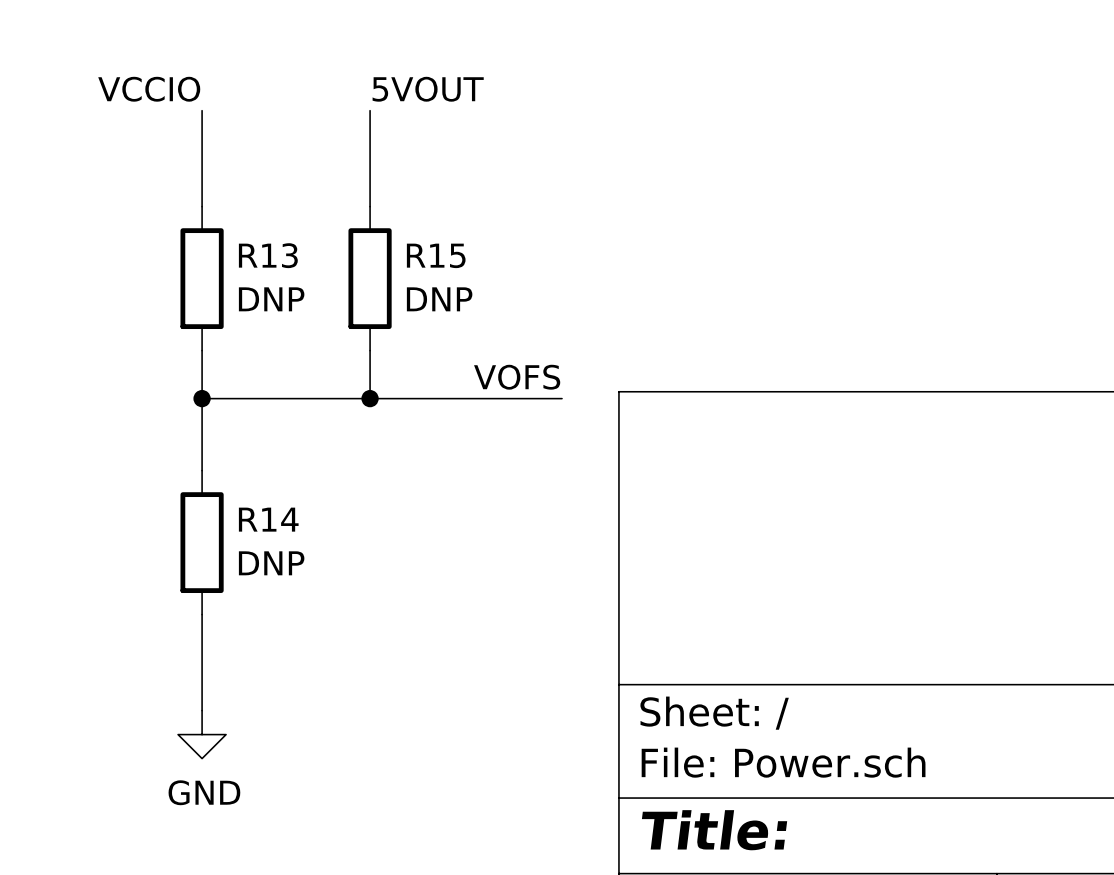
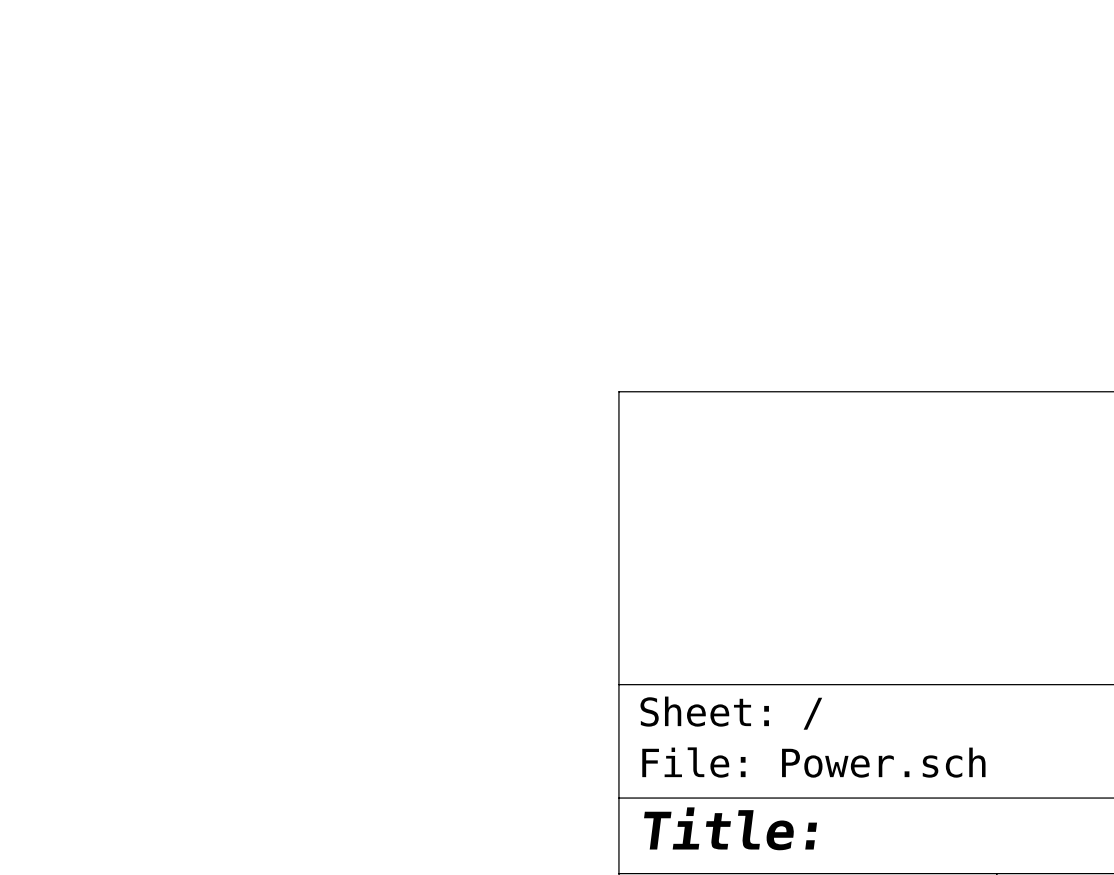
label: VCCIO (149, 89) -> none
label: 5VOUT (428, 89) -> none
wire: (202, 110) (202, 206) -> none
wire: (370, 110) (370, 206) -> none
R13: DNP (202, 278) -> none
R15: DNP (370, 278) -> none
wire: (202, 350) (202, 470) -> none
wire: (370, 350) (370, 398) -> none
label: VOFS (517, 377) -> none
wire: (202, 398) (562, 398) -> none
junction: (202, 398) -> none
junction: (370, 398) -> none
R14: DNP (202, 542) -> none
wire: (202, 614) (202, 710) -> none
power symbol: GND (202, 734) -> none

